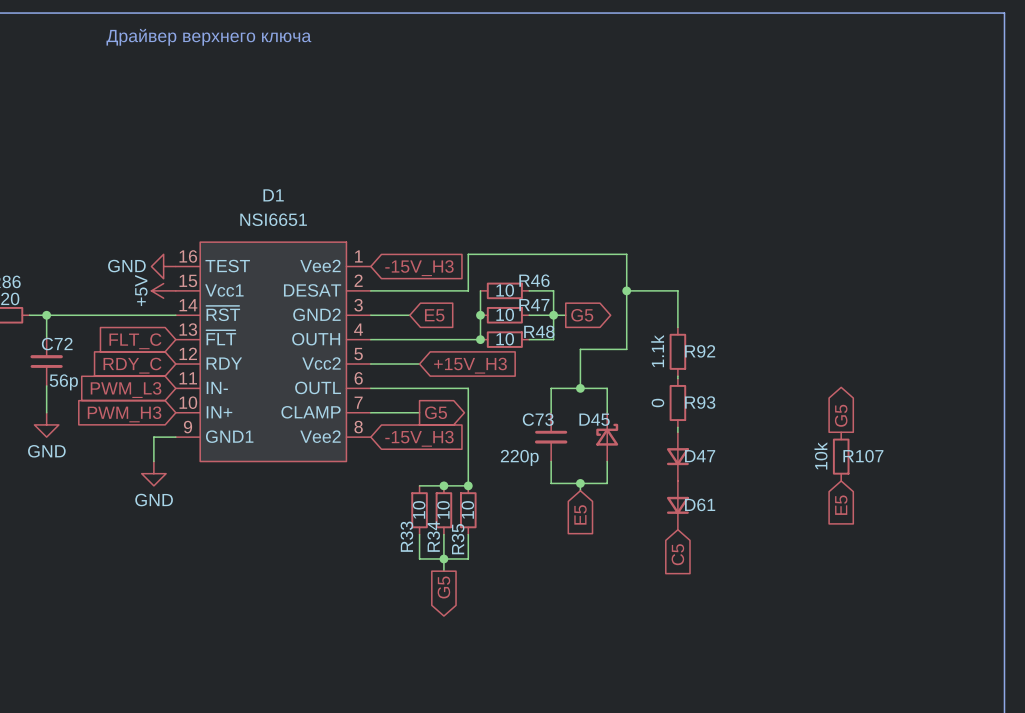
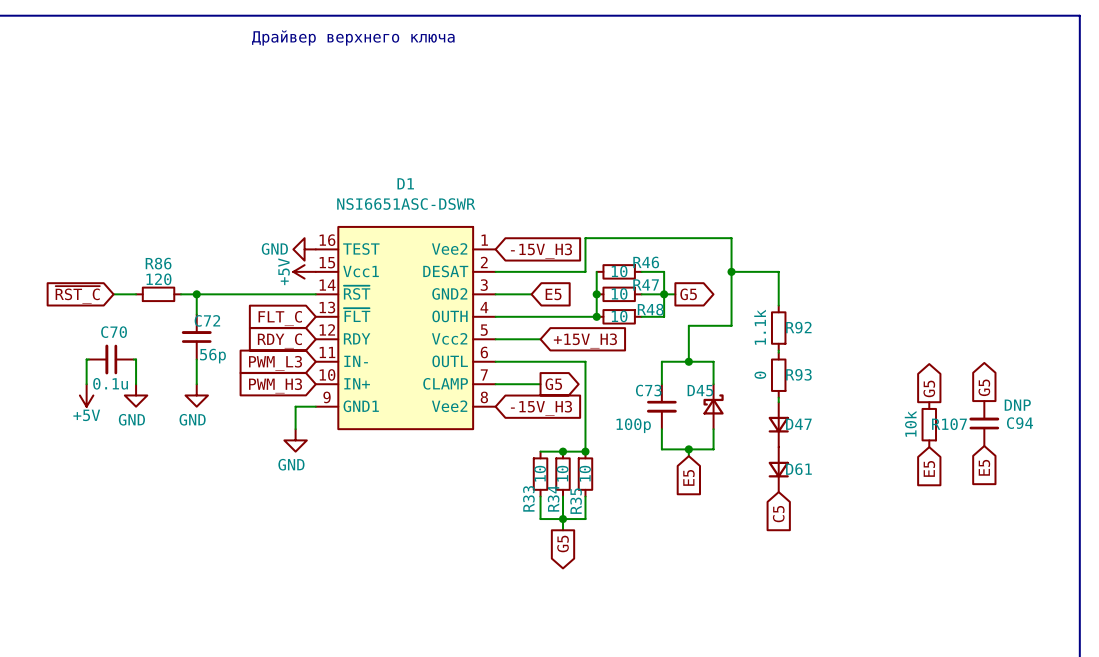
D1 value: NSI6651 (273, 219) -> NSI6651ASC-DSWR (406, 204)
global label: none -> G5 (984, 387)
C94: none -> DNP (984, 423)
C73 value: 220p (519, 457) -> 100p (633, 425)
global label: none -> E5 (984, 467)

